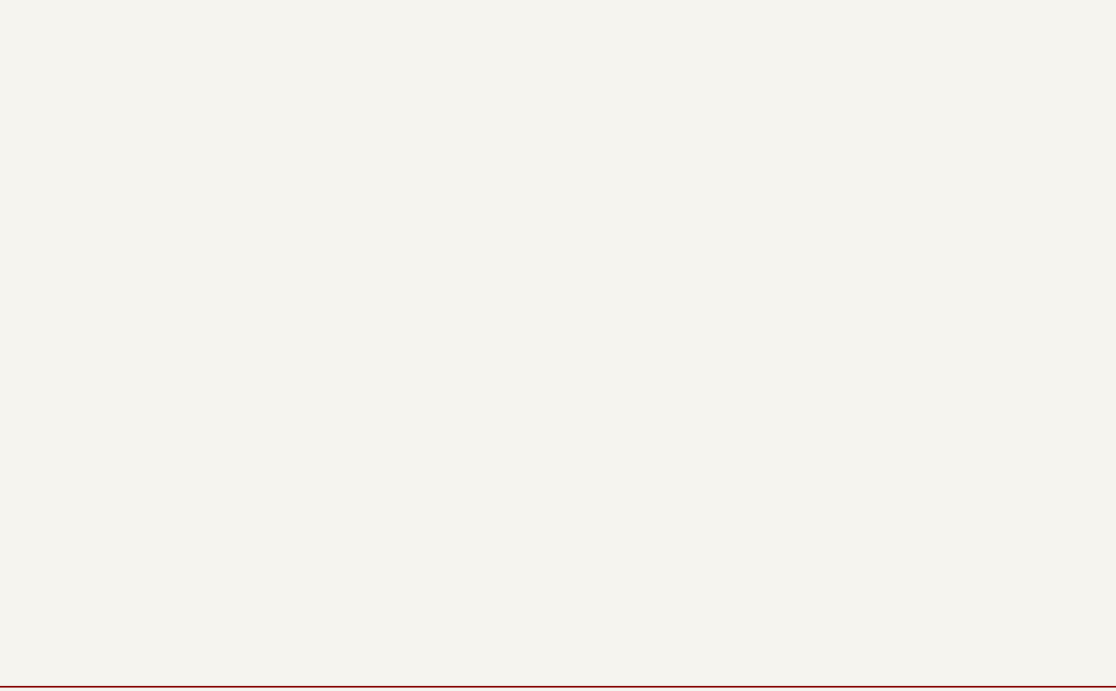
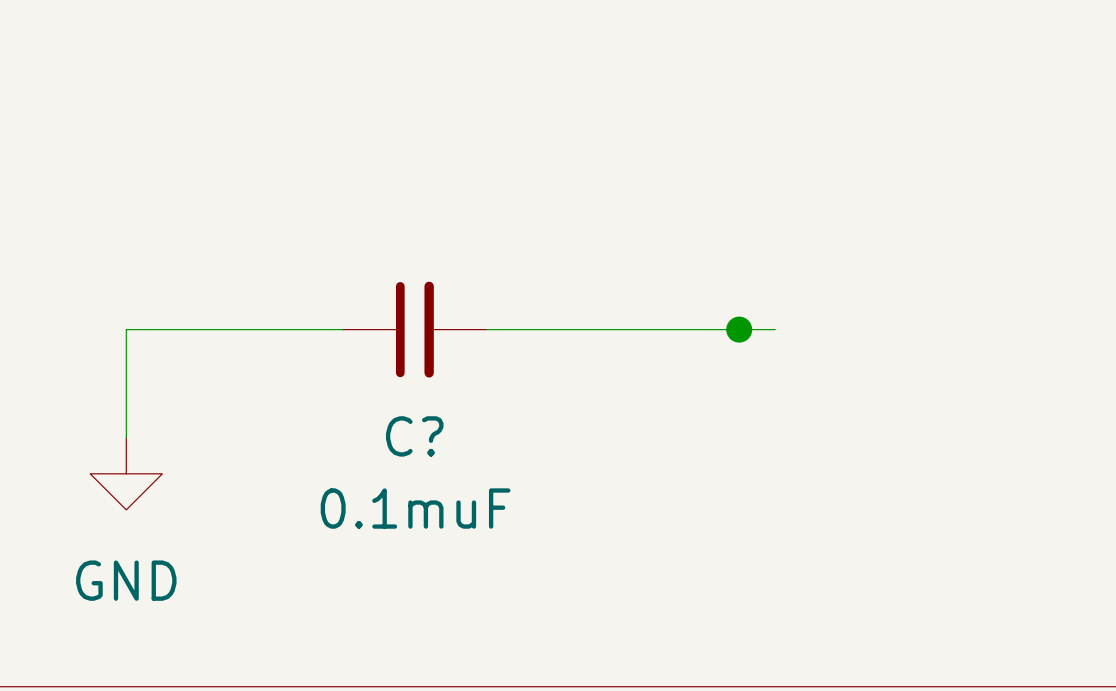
wire: none -> (342, 329) (126, 329) (126, 437)
C?: none -> 0.1muF (414, 329)
wire: none -> (486, 329) (775, 329)
junction: none -> (739, 329)
power symbol: none -> GND (126, 473)

